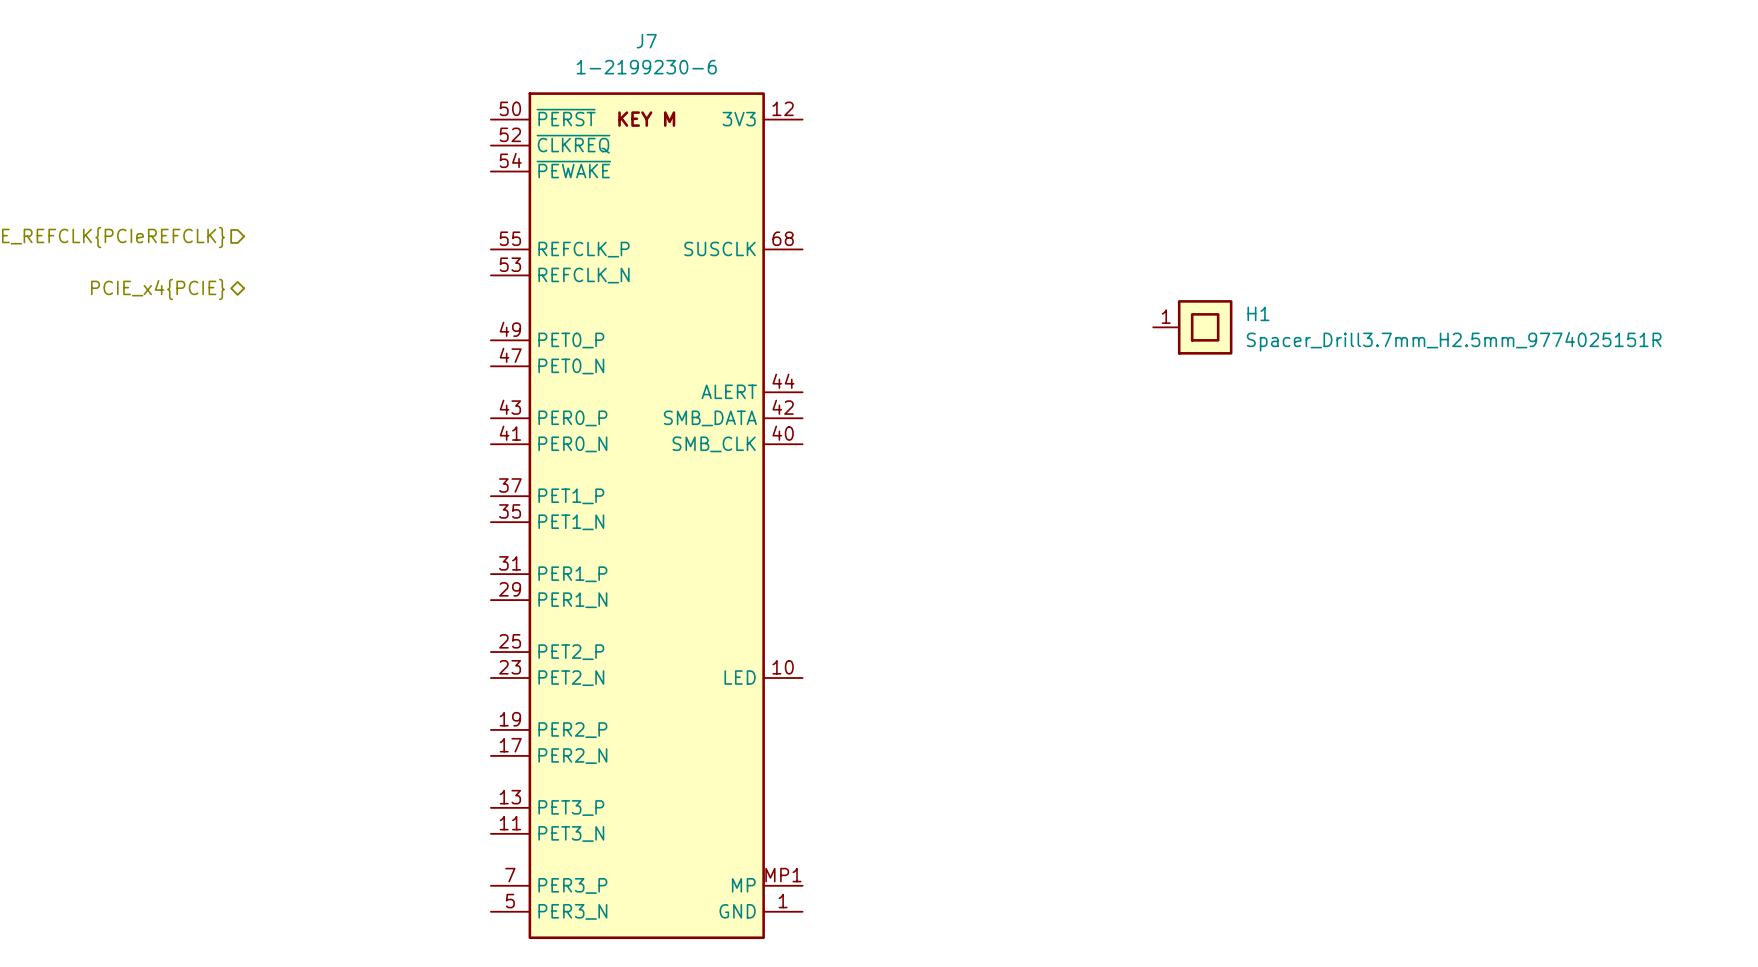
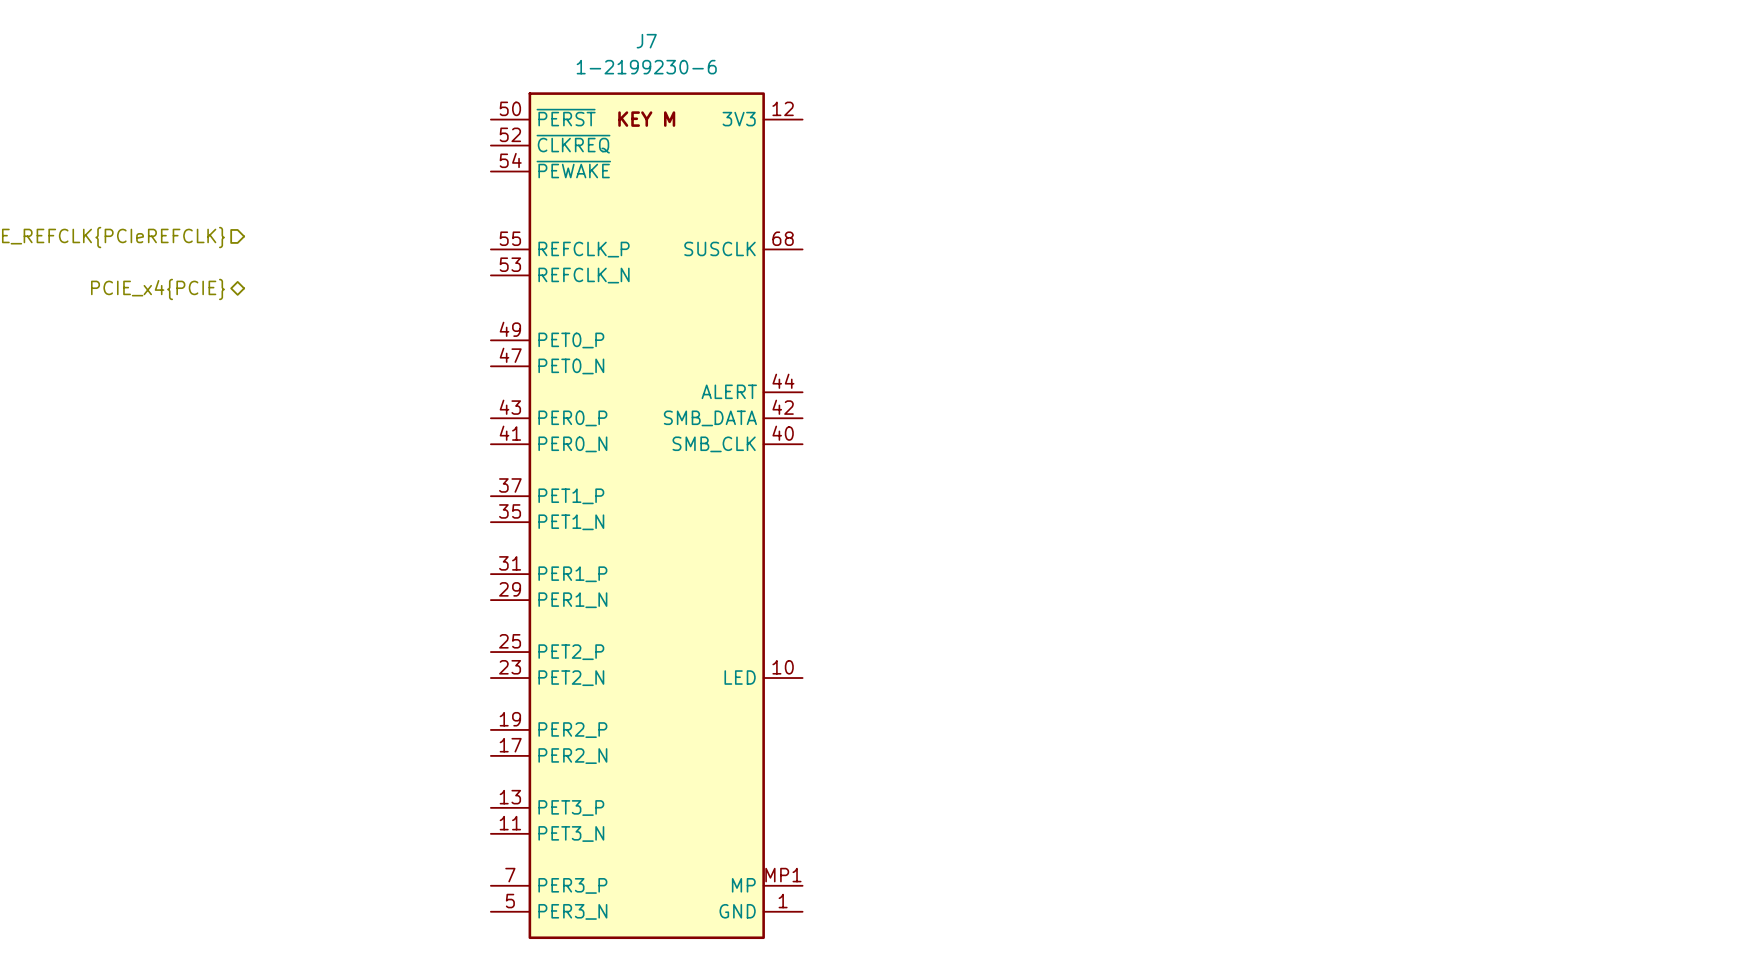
H1: Spacer_Drill3.7mm_H2.5mm_9774025151R (1192, 327) -> none

